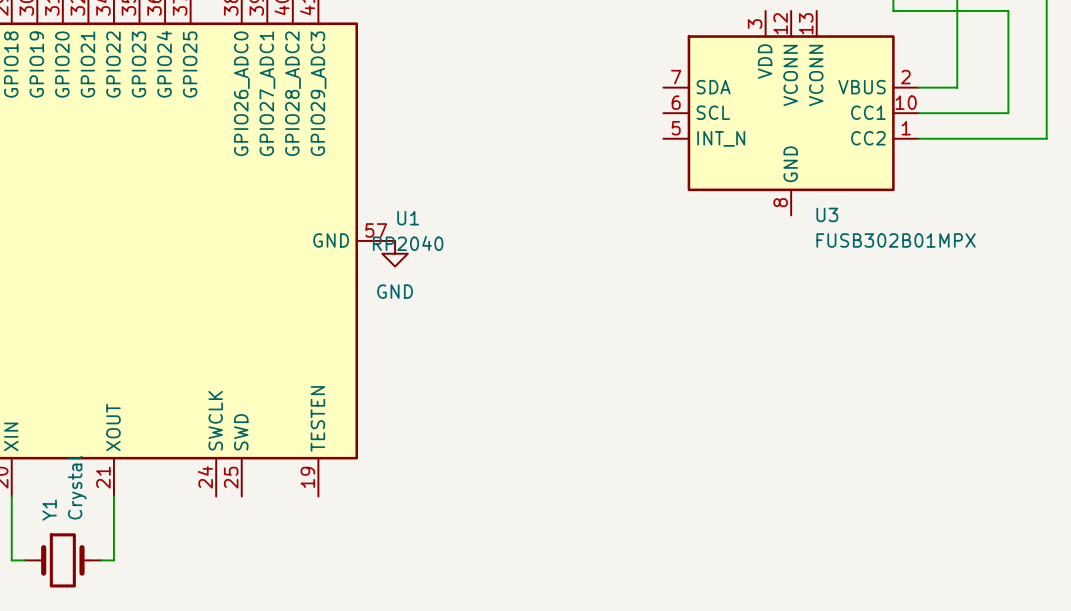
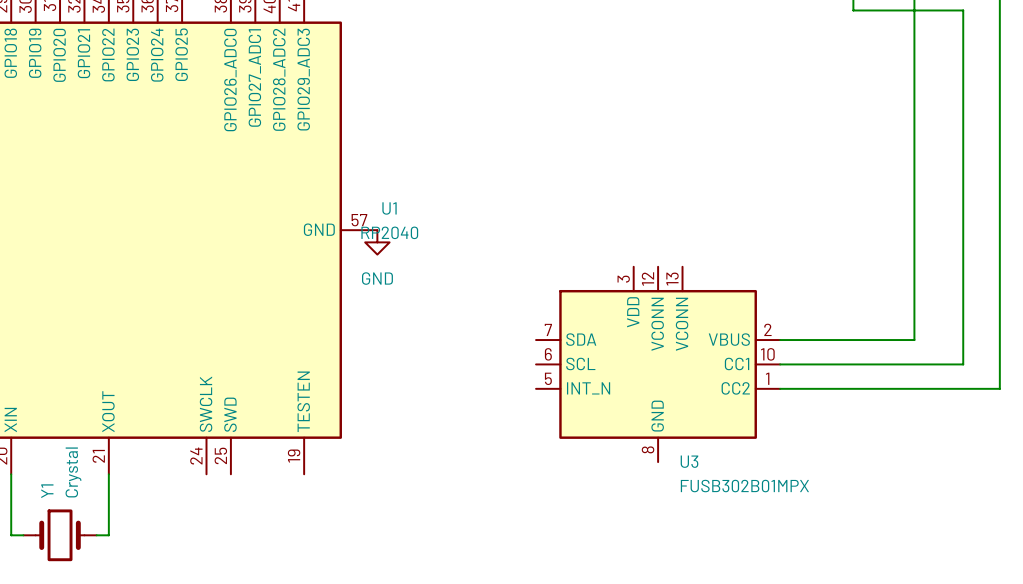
wire: (918, 87) (957, 87) -> (780, 340) (914, 340) (914, 83)
U3 position: (791, 113) -> (658, 364)
wire: (918, 113) (1008, 113) -> (780, 364) (963, 364) (963, 108)
wire: (918, 138) (1046, 138) -> (780, 388) (999, 388) (999, 132)

